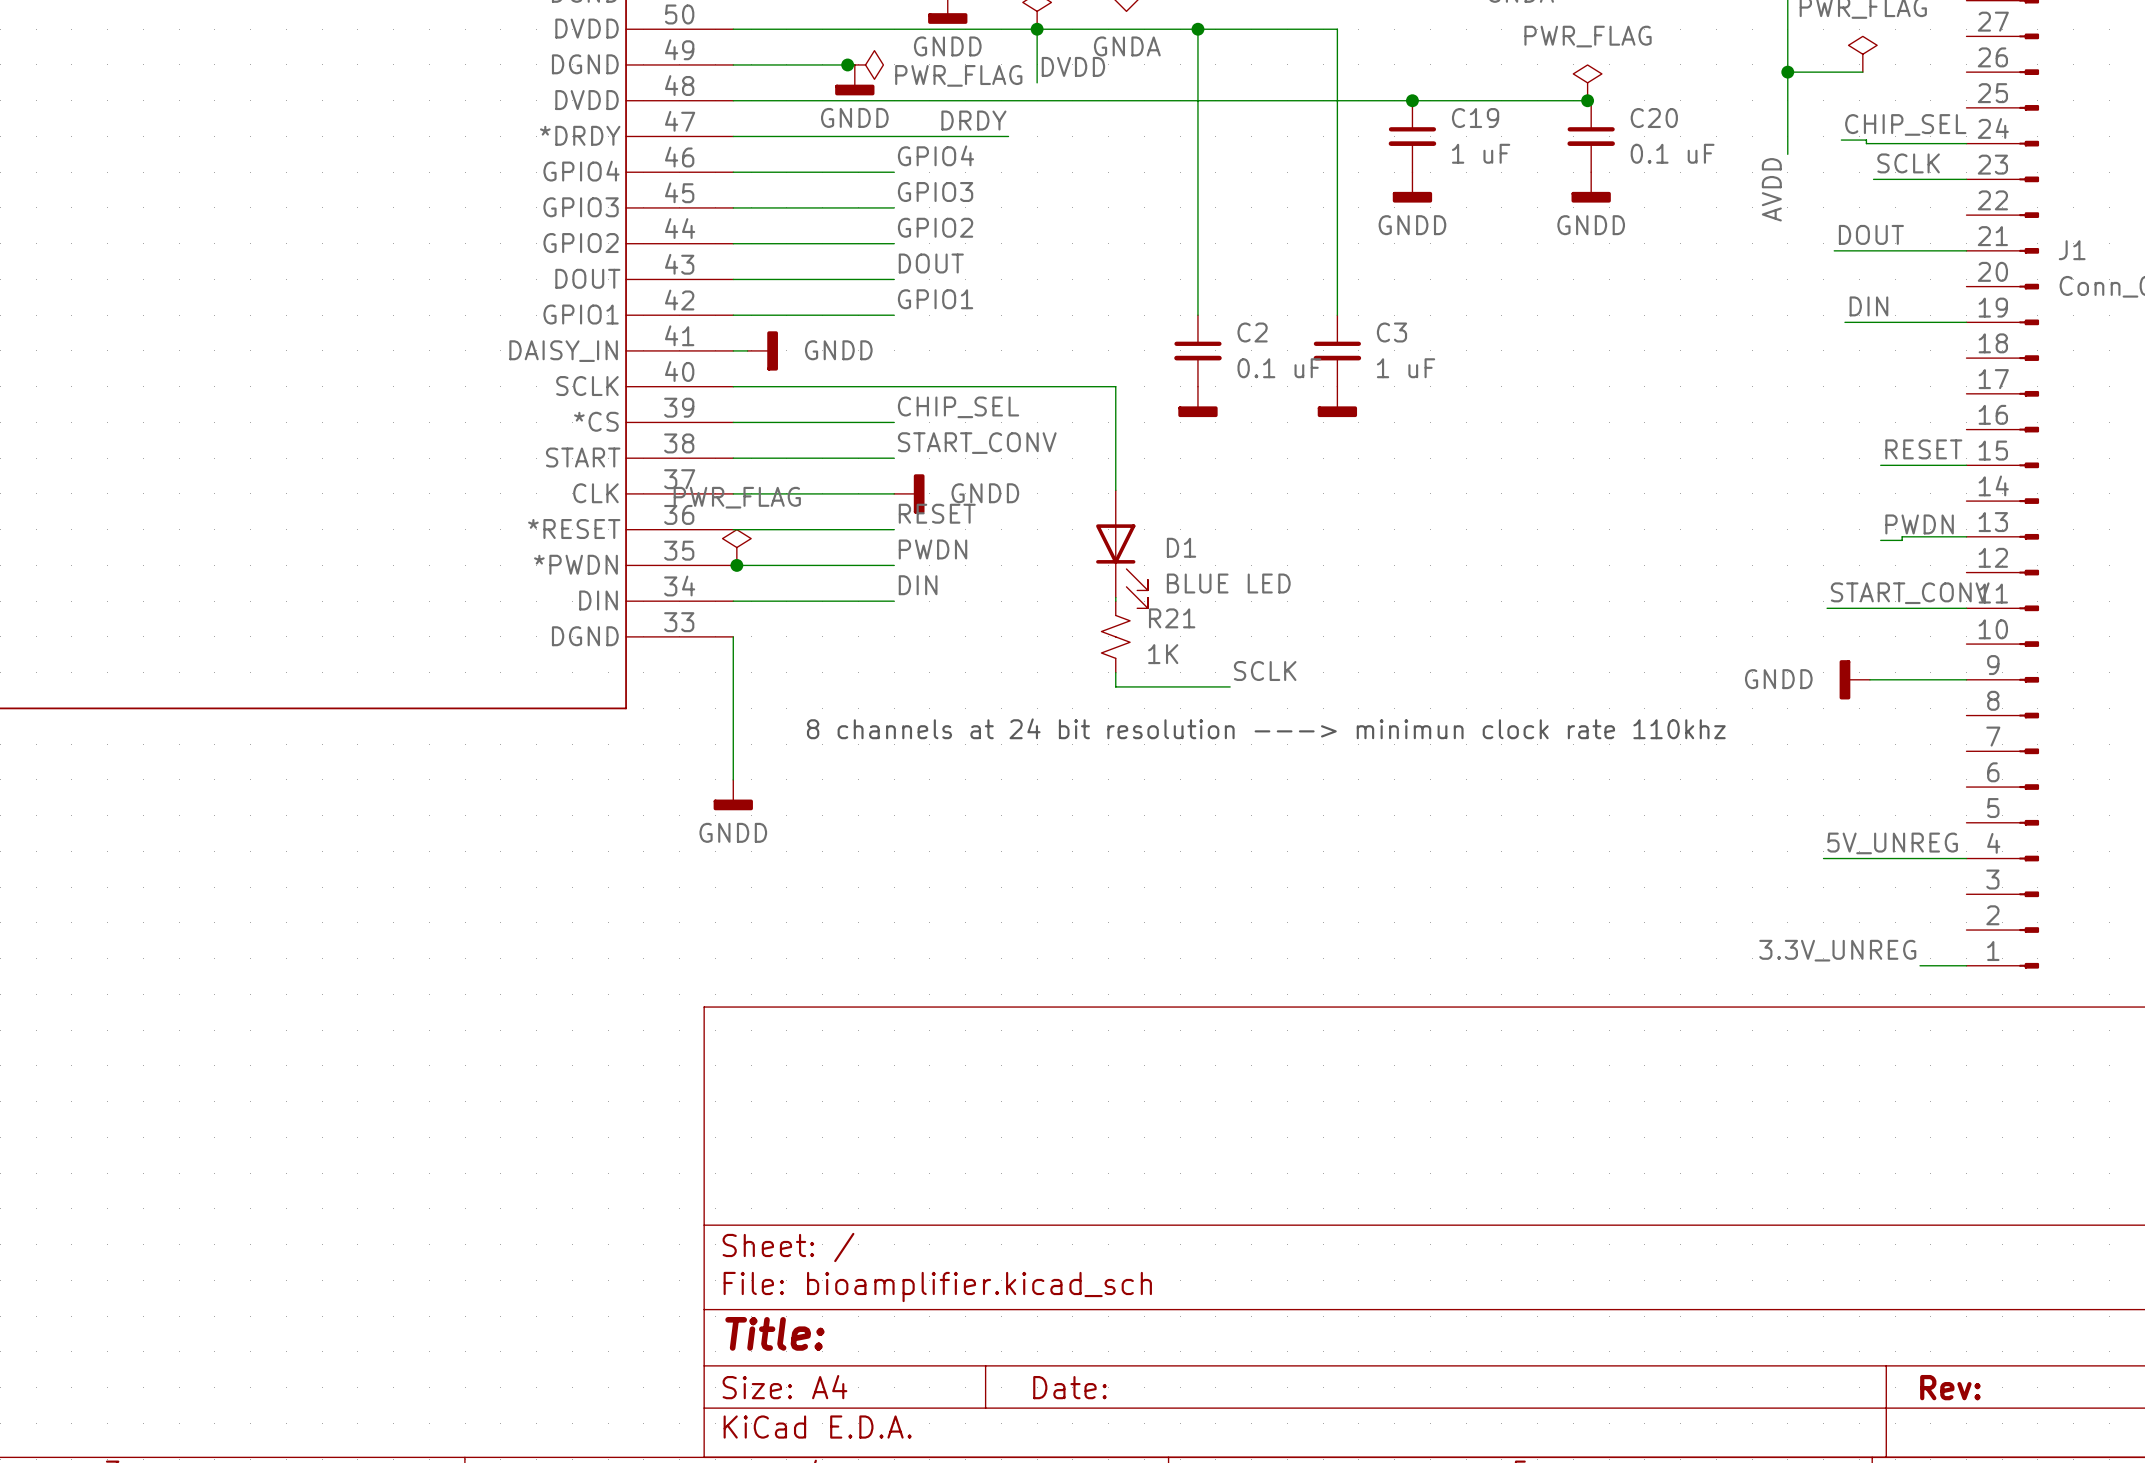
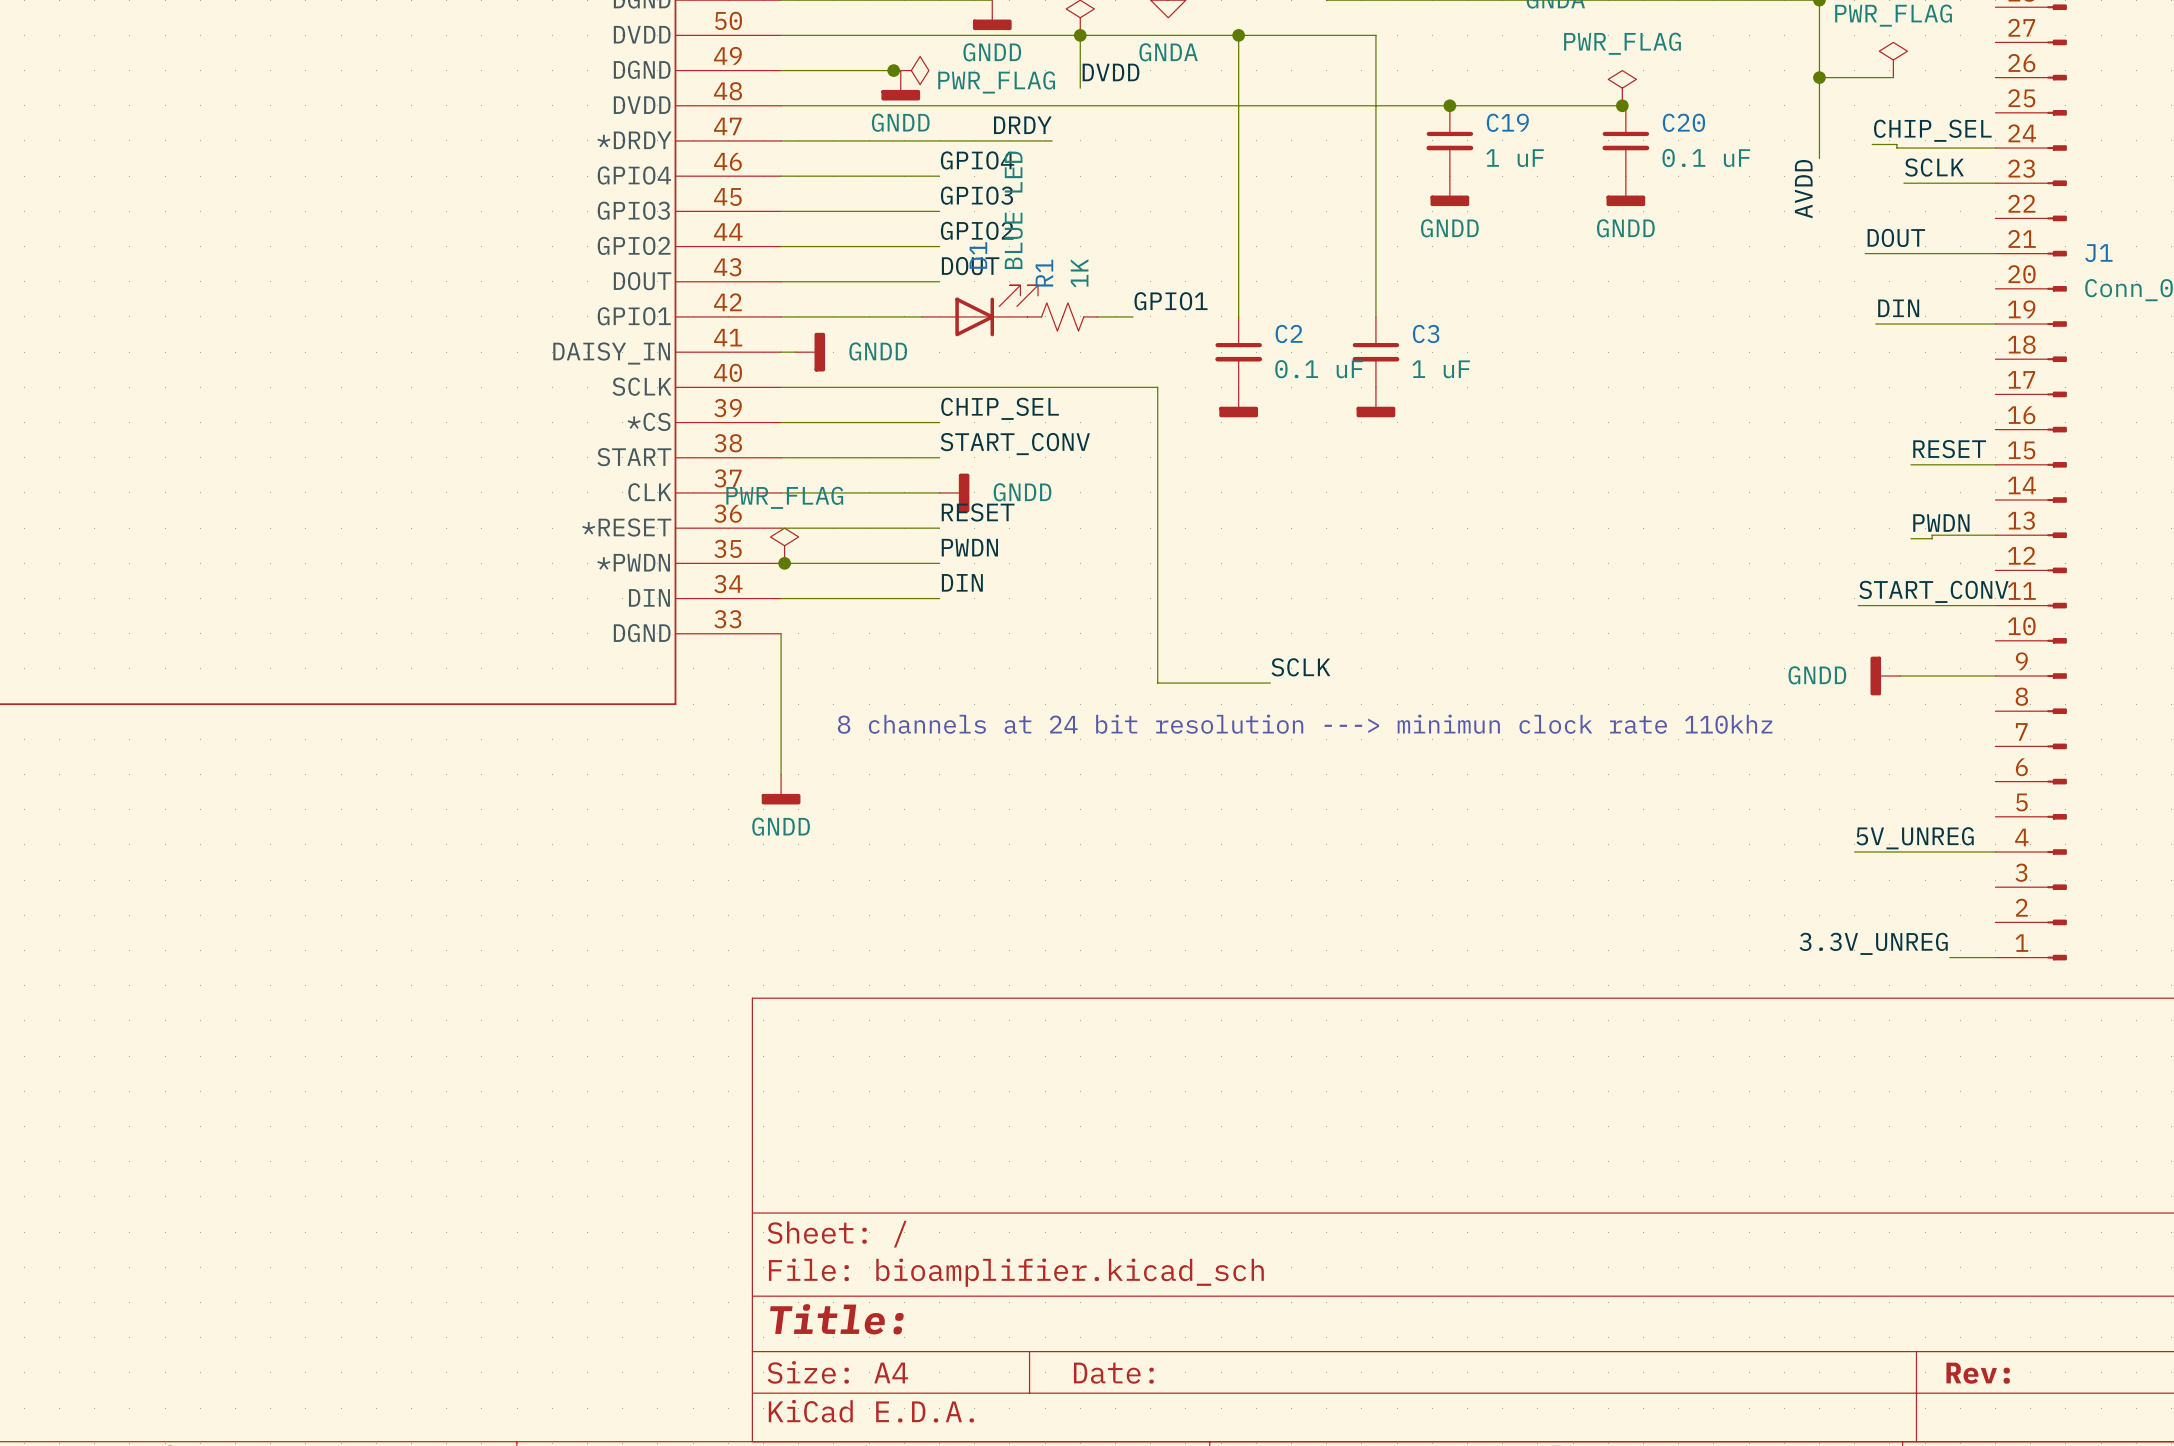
label position: GPIO1 (935, 299) -> GPIO1 (1171, 301)
R1: none -> 1K (1062, 316)
wire: none -> (1097, 316) (1133, 316)
D1 position: (1122, 549) -> (979, 310)
D1 rotation: 0° (1122, 566) -> 90° counterclockwise (996, 310)
wire: none -> (1157, 598) (1157, 668)
R21: 1K (1115, 636) -> none

